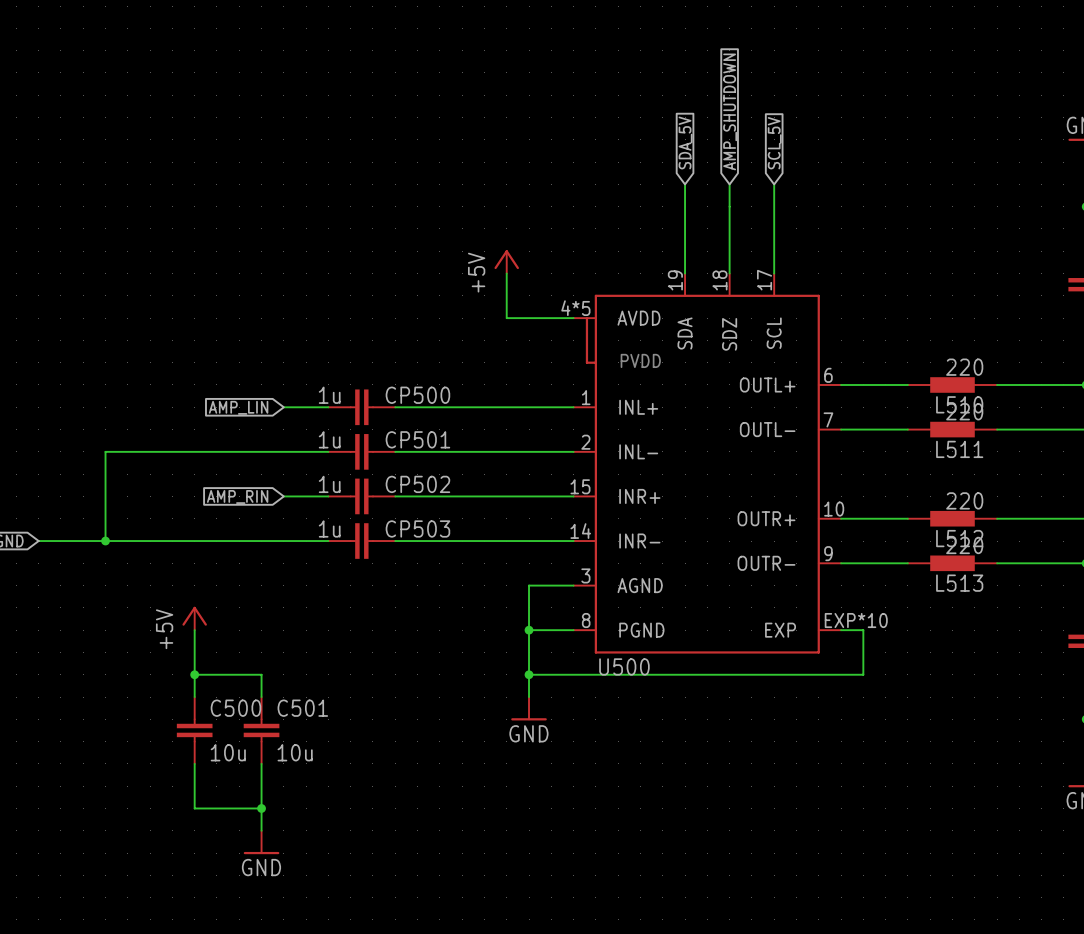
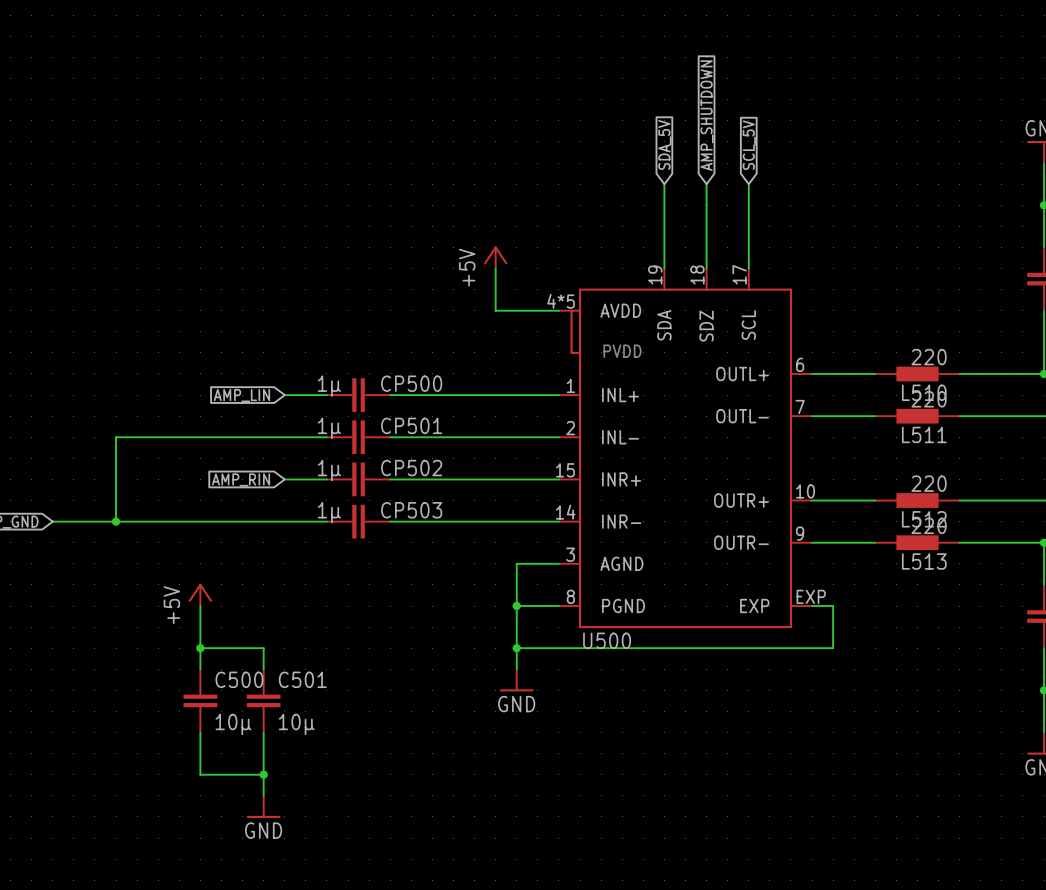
CP500 value: 1u (329, 395) -> 1µ (329, 386)
CP501 value: 1u (329, 439) -> 1µ (329, 428)
CP502 value: 1u (329, 484) -> 1µ (329, 470)
CP503 value: 1u (329, 528) -> 1µ (329, 512)
U500 pin number: EXP*10 (856, 620) -> EXP (811, 596)
C500 value: 10u (228, 752) -> 10µ (233, 724)
C501 value: 10u (295, 752) -> 10µ (296, 724)

